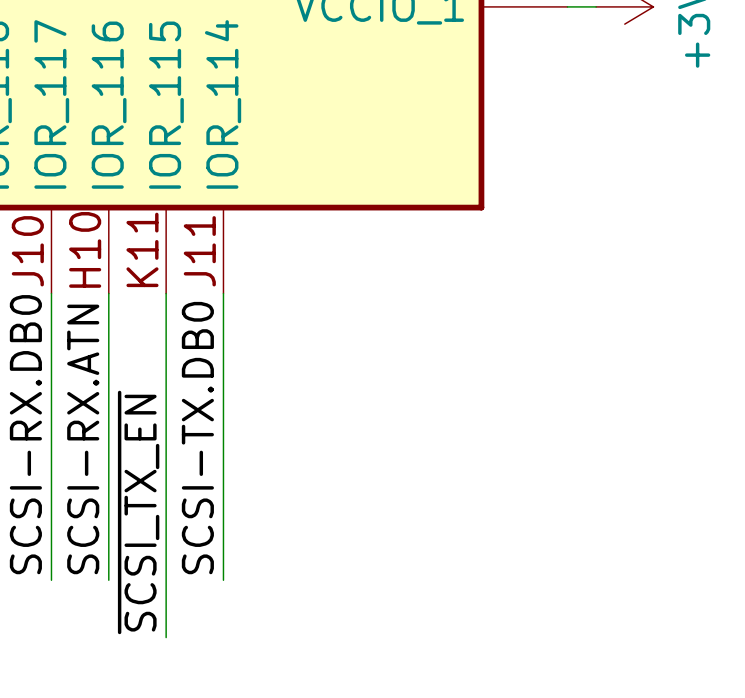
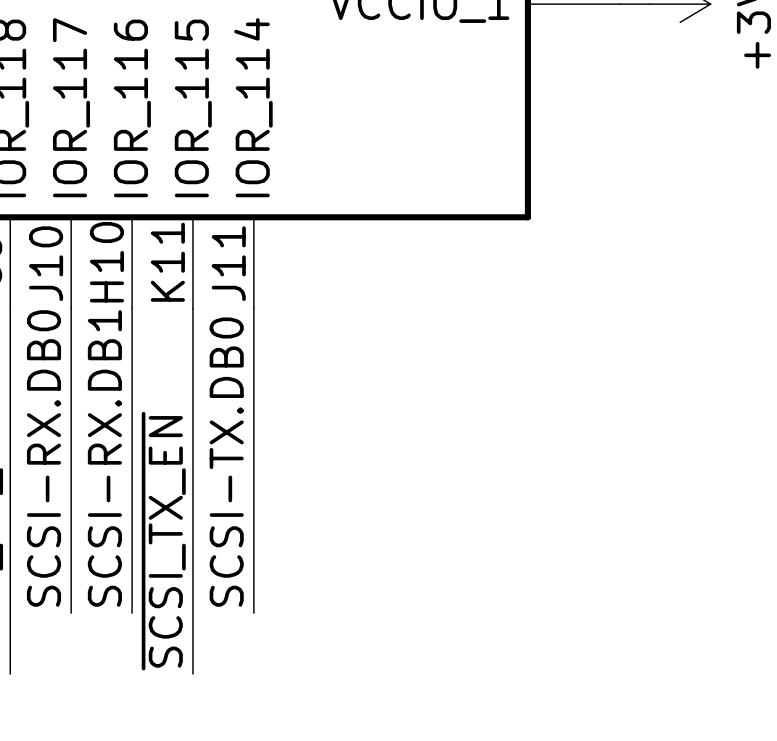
label: SCSI-RX.ATN (83, 439) -> SCSI-RX.DB1 (104, 458)

